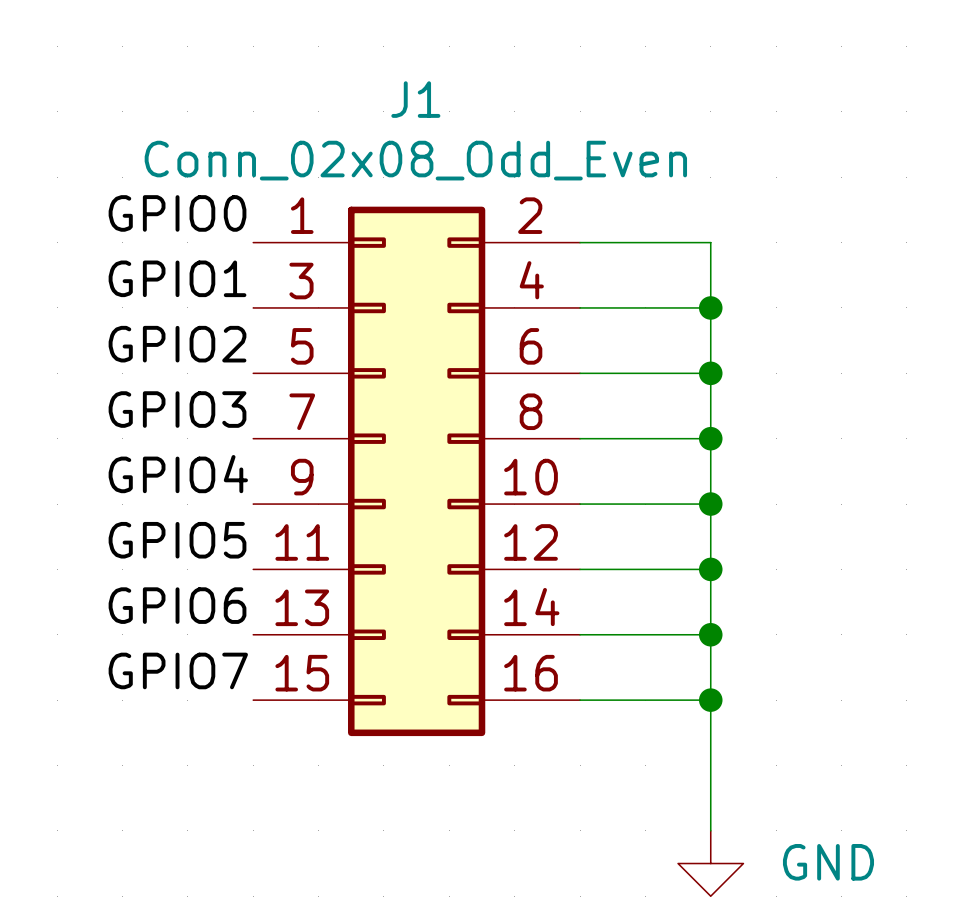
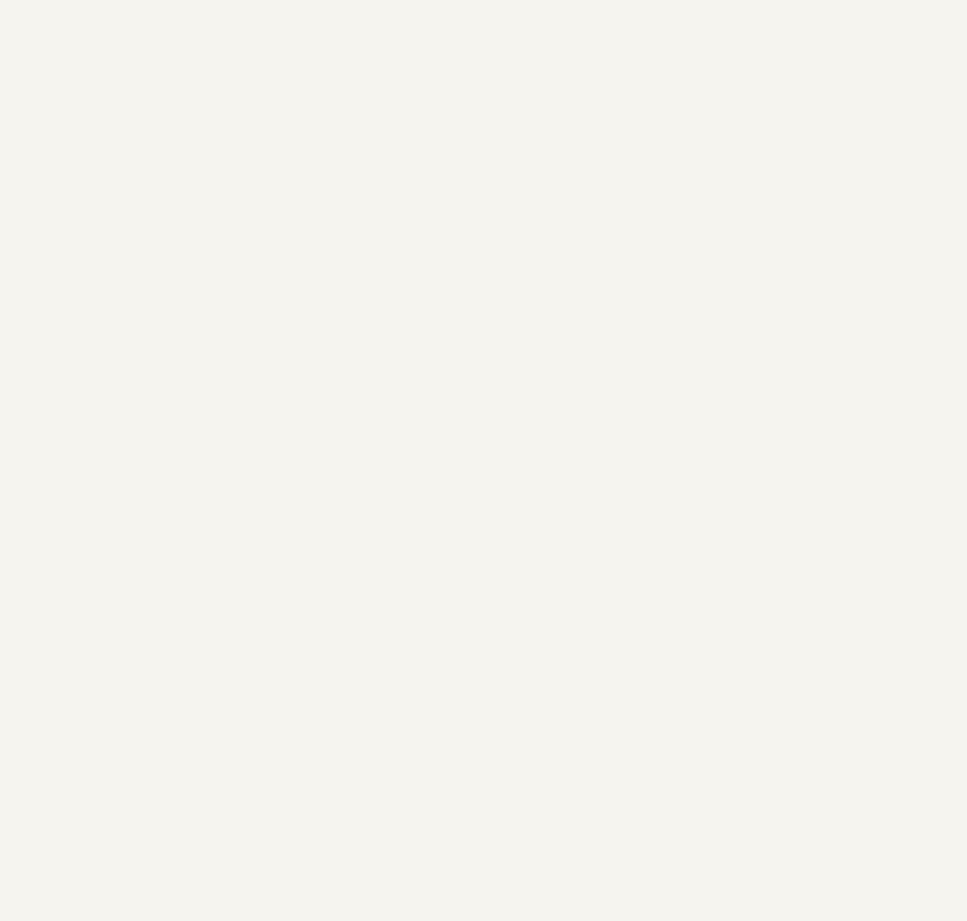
label: GPIO0 (177, 213) -> none
wire: (580, 242) (710, 242) (710, 830) -> none
label: GPIO1 (177, 278) -> none
wire: (580, 307) (710, 307) -> none
junction: (710, 307) -> none
label: GPIO2 (177, 344) -> none
wire: (580, 373) (710, 373) -> none
junction: (710, 373) -> none
label: GPIO3 (177, 409) -> none
wire: (580, 438) (710, 438) -> none
junction: (710, 438) -> none
J1: Conn_02x08_Odd_Even (416, 471) -> none
label: GPIO4 (178, 474) -> none
wire: (580, 504) (710, 504) -> none
junction: (710, 504) -> none
label: GPIO5 (177, 540) -> none
wire: (580, 569) (710, 569) -> none
junction: (710, 569) -> none
label: GPIO6 (177, 605) -> none
wire: (580, 634) (710, 634) -> none
junction: (710, 634) -> none
label: GPIO7 (178, 670) -> none
wire: (580, 700) (710, 700) -> none
junction: (710, 700) -> none
power symbol: GND (710, 863) -> none

